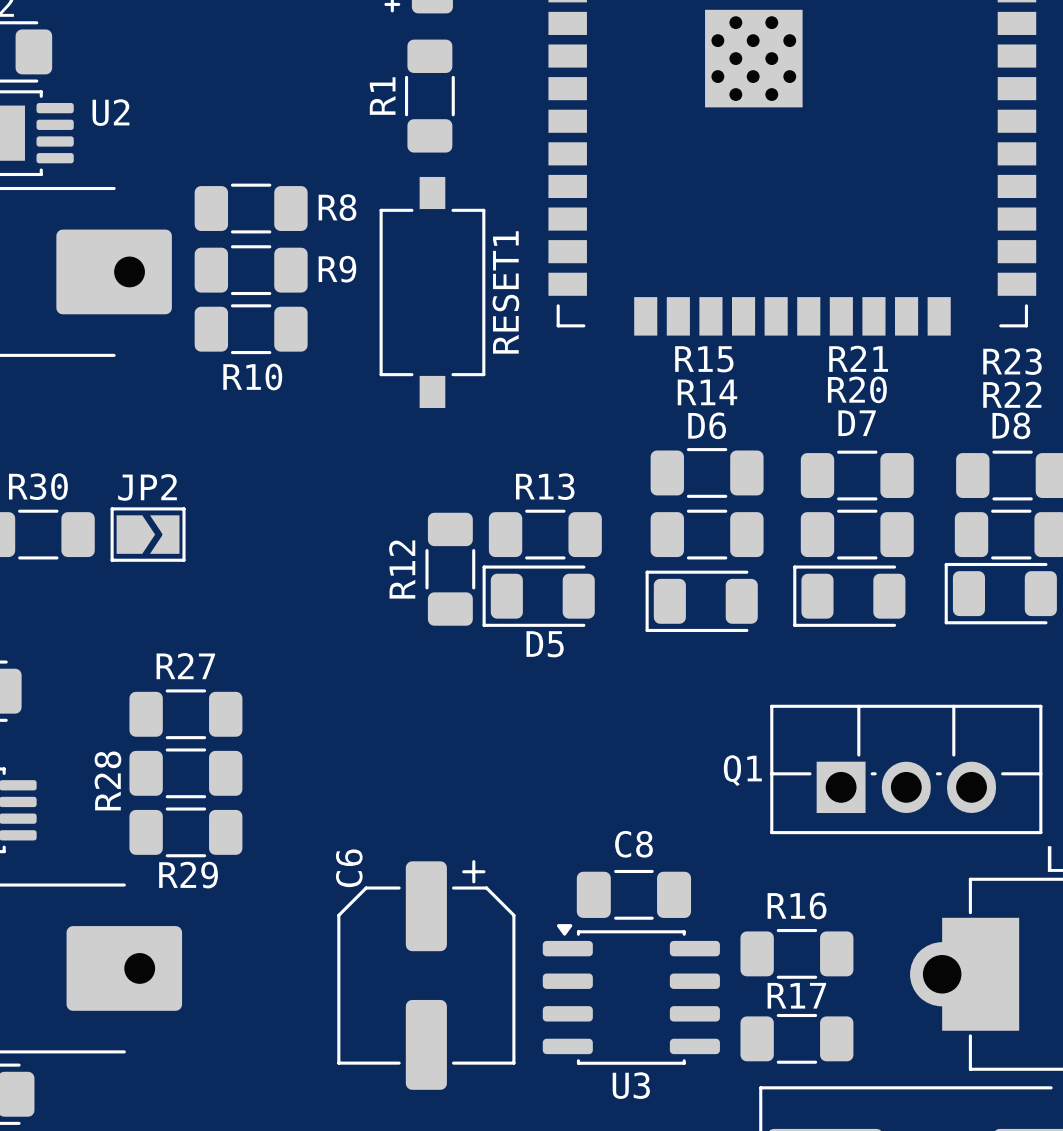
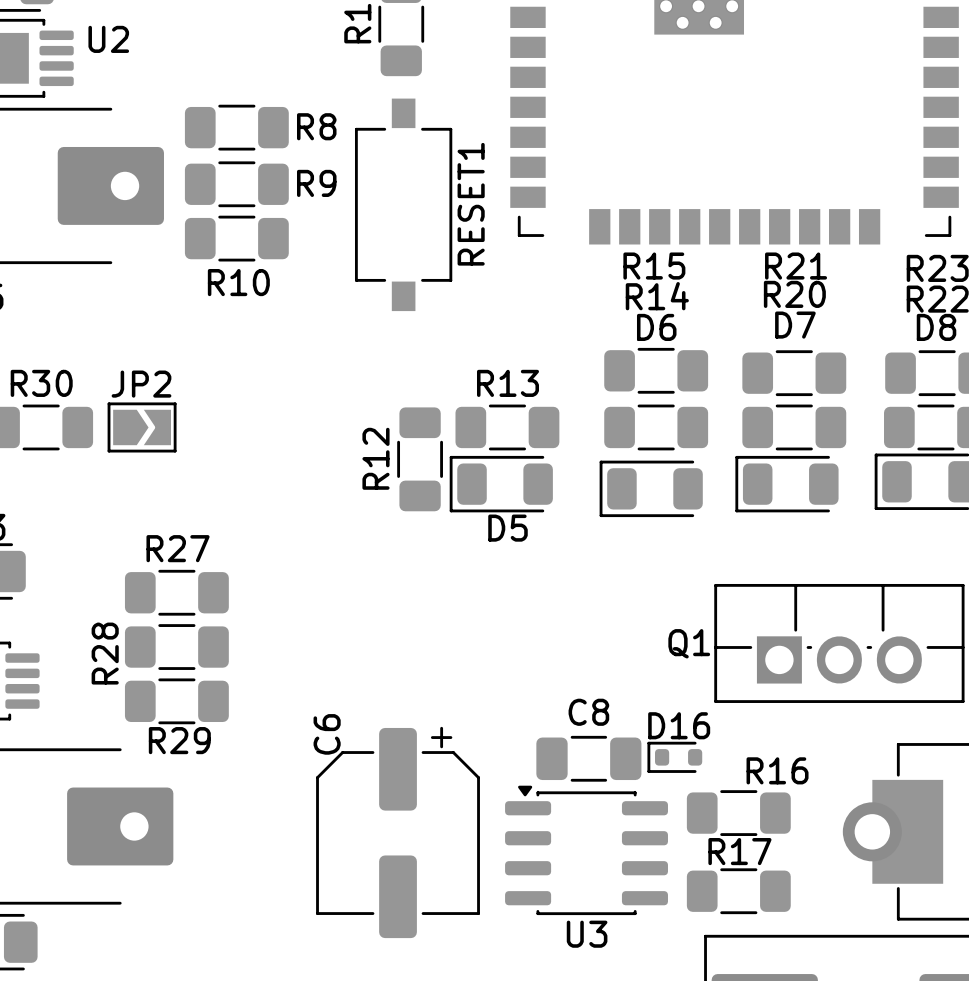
D16: none -> (674, 757)
R16 name position: R16 (797, 905) -> R16 (777, 770)

